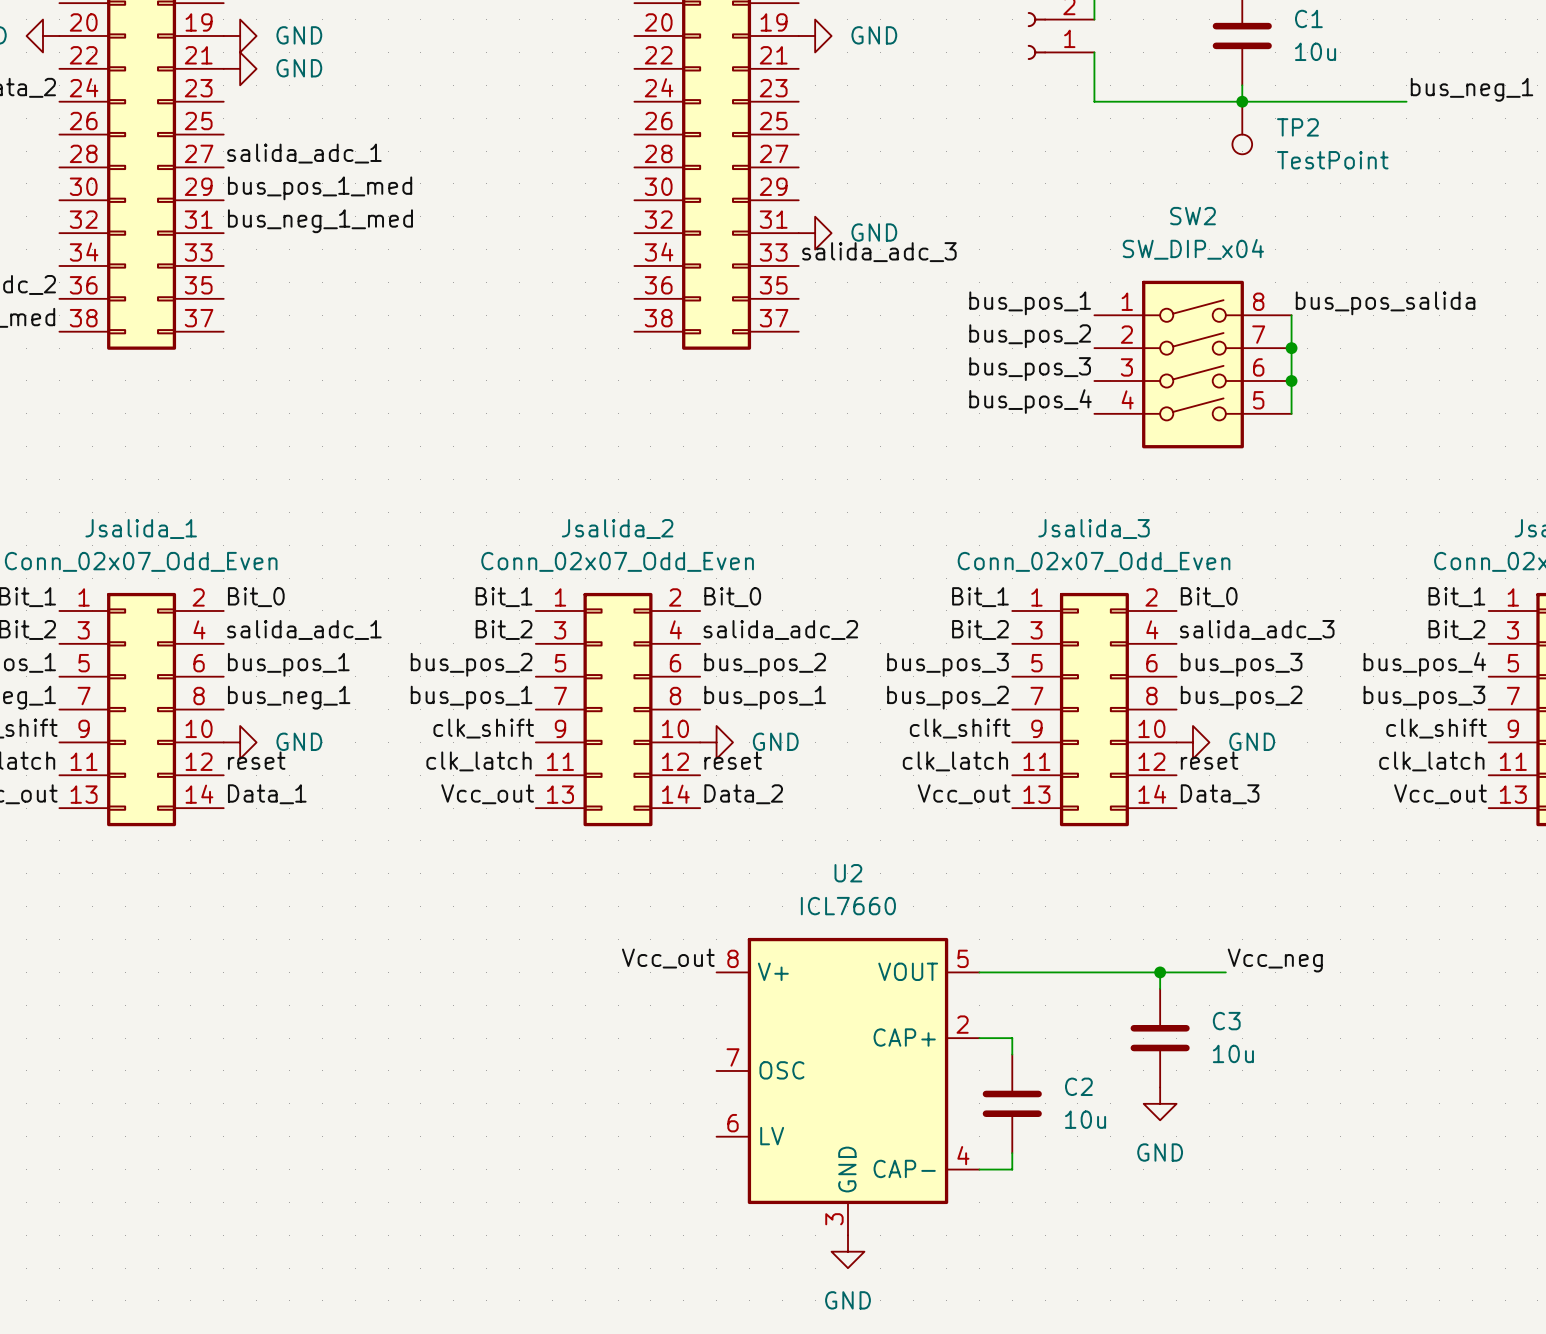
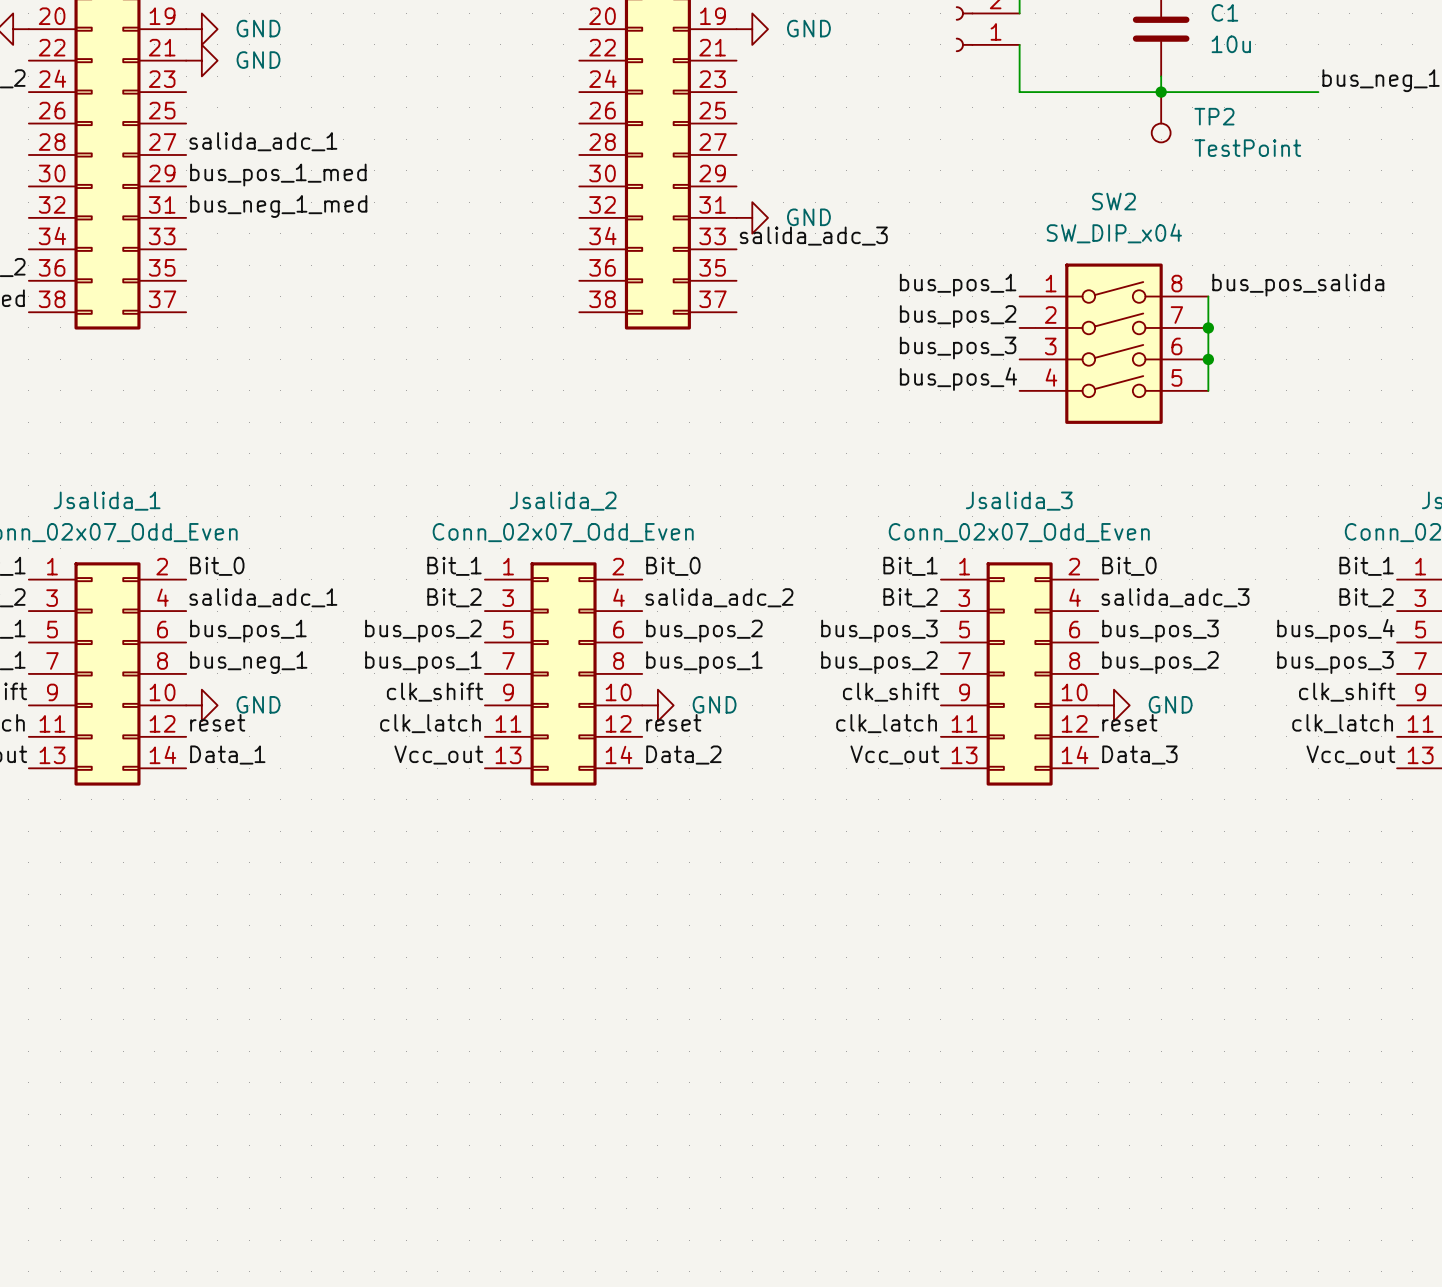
label: Vcc_out (668, 958) -> none
label: Vcc_neg (1275, 960) -> none
wire: (979, 972) (1225, 972) -> none
wire: (1160, 972) (1160, 988) -> none
junction: (1160, 972) -> none
wire: (979, 1038) (1012, 1038) (1012, 1054) -> none
C3: 10u (1160, 1038) -> none
U2: ICL7660 (847, 1086) -> none
C2: 10u (1012, 1103) -> none
power symbol: GND (1160, 1103) -> none
wire: (1012, 1153) (1012, 1169) (979, 1169) -> none
power symbol: GND (847, 1251) -> none

